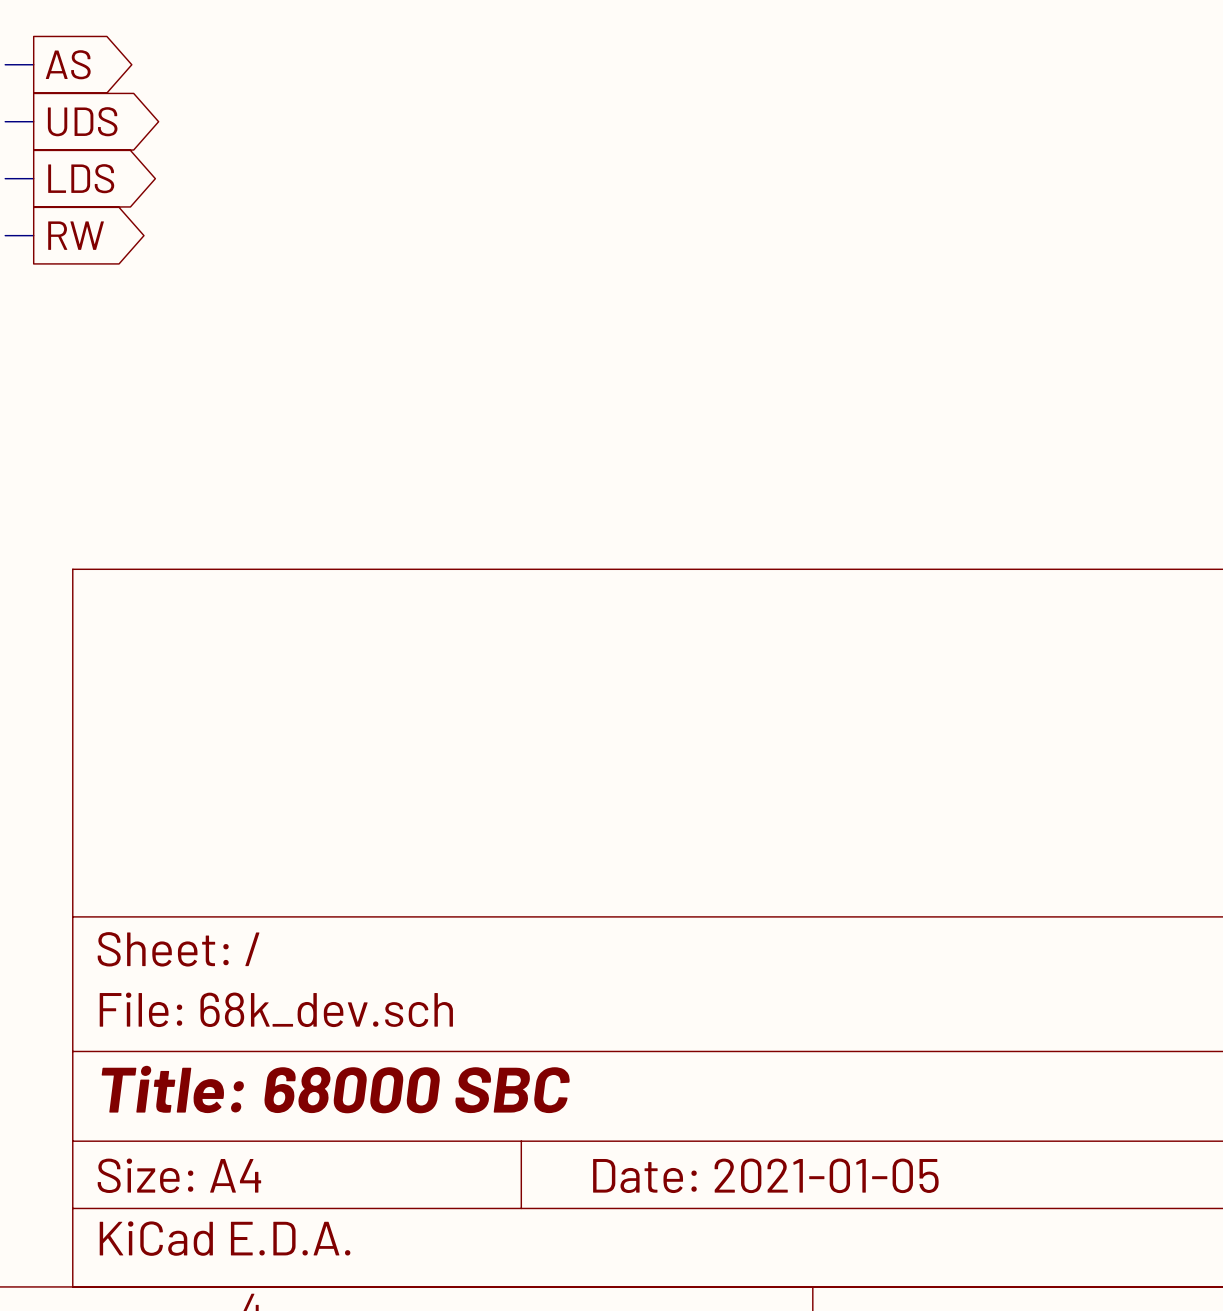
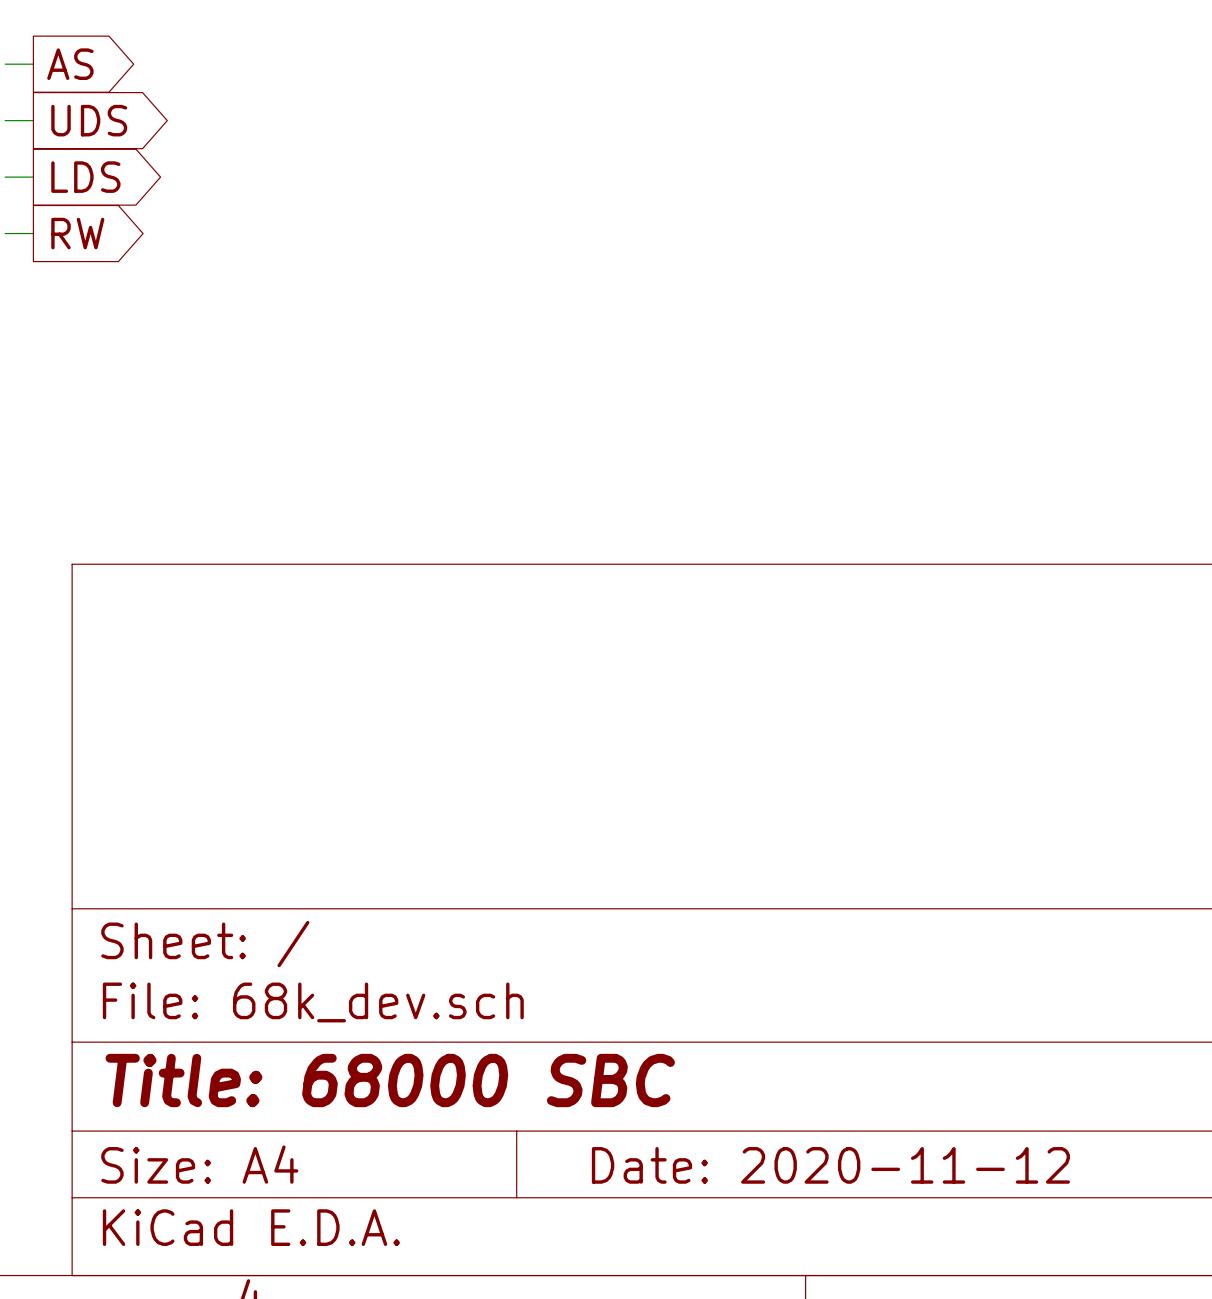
title block: Date: 2021-01-05 (765, 1175) -> Date: 2020-11-12 (830, 1165)

